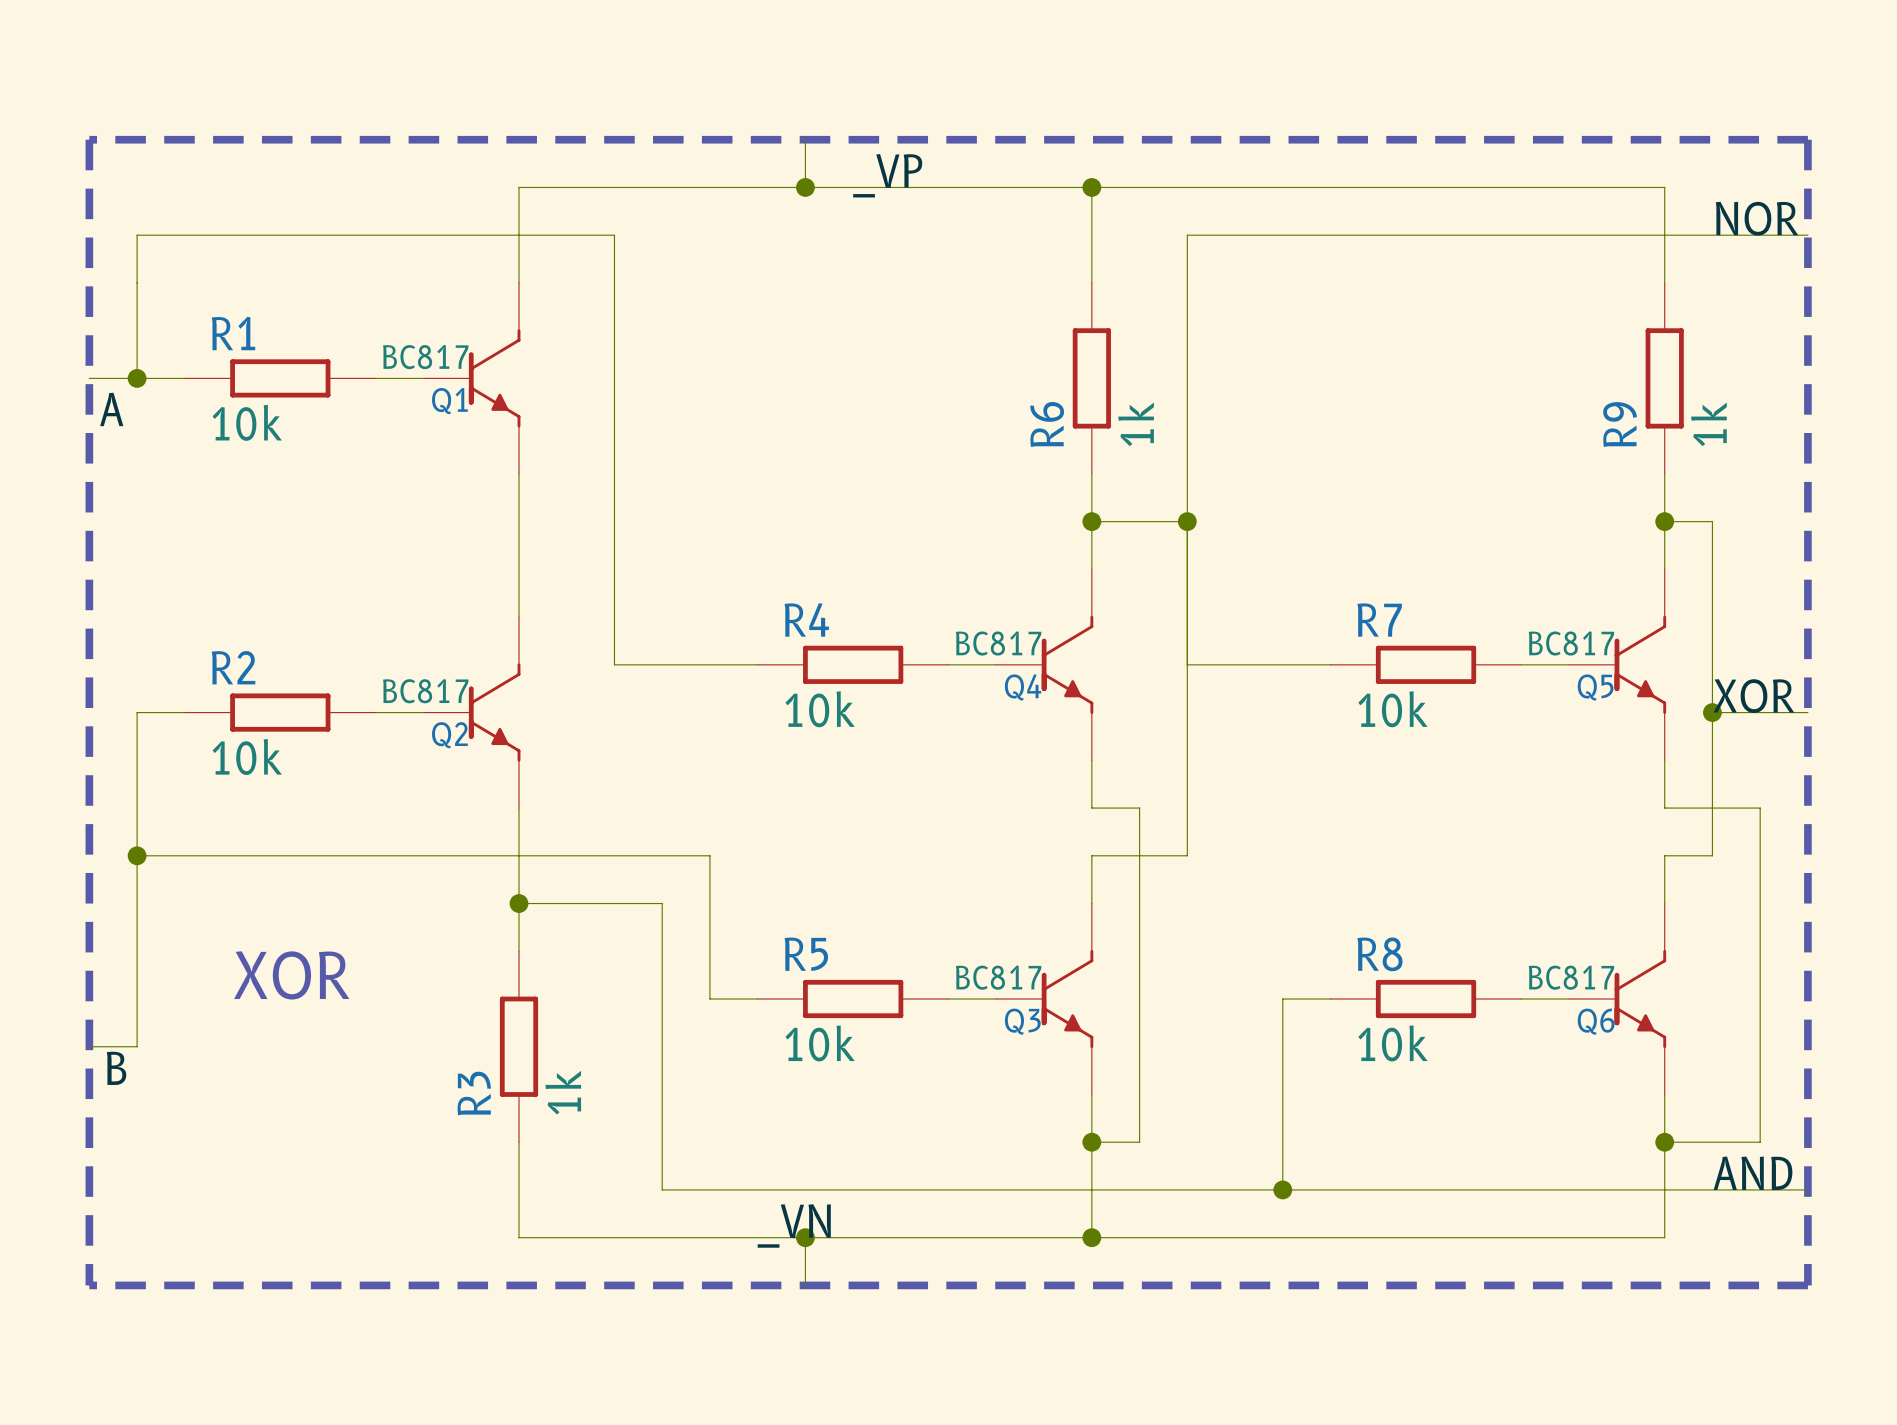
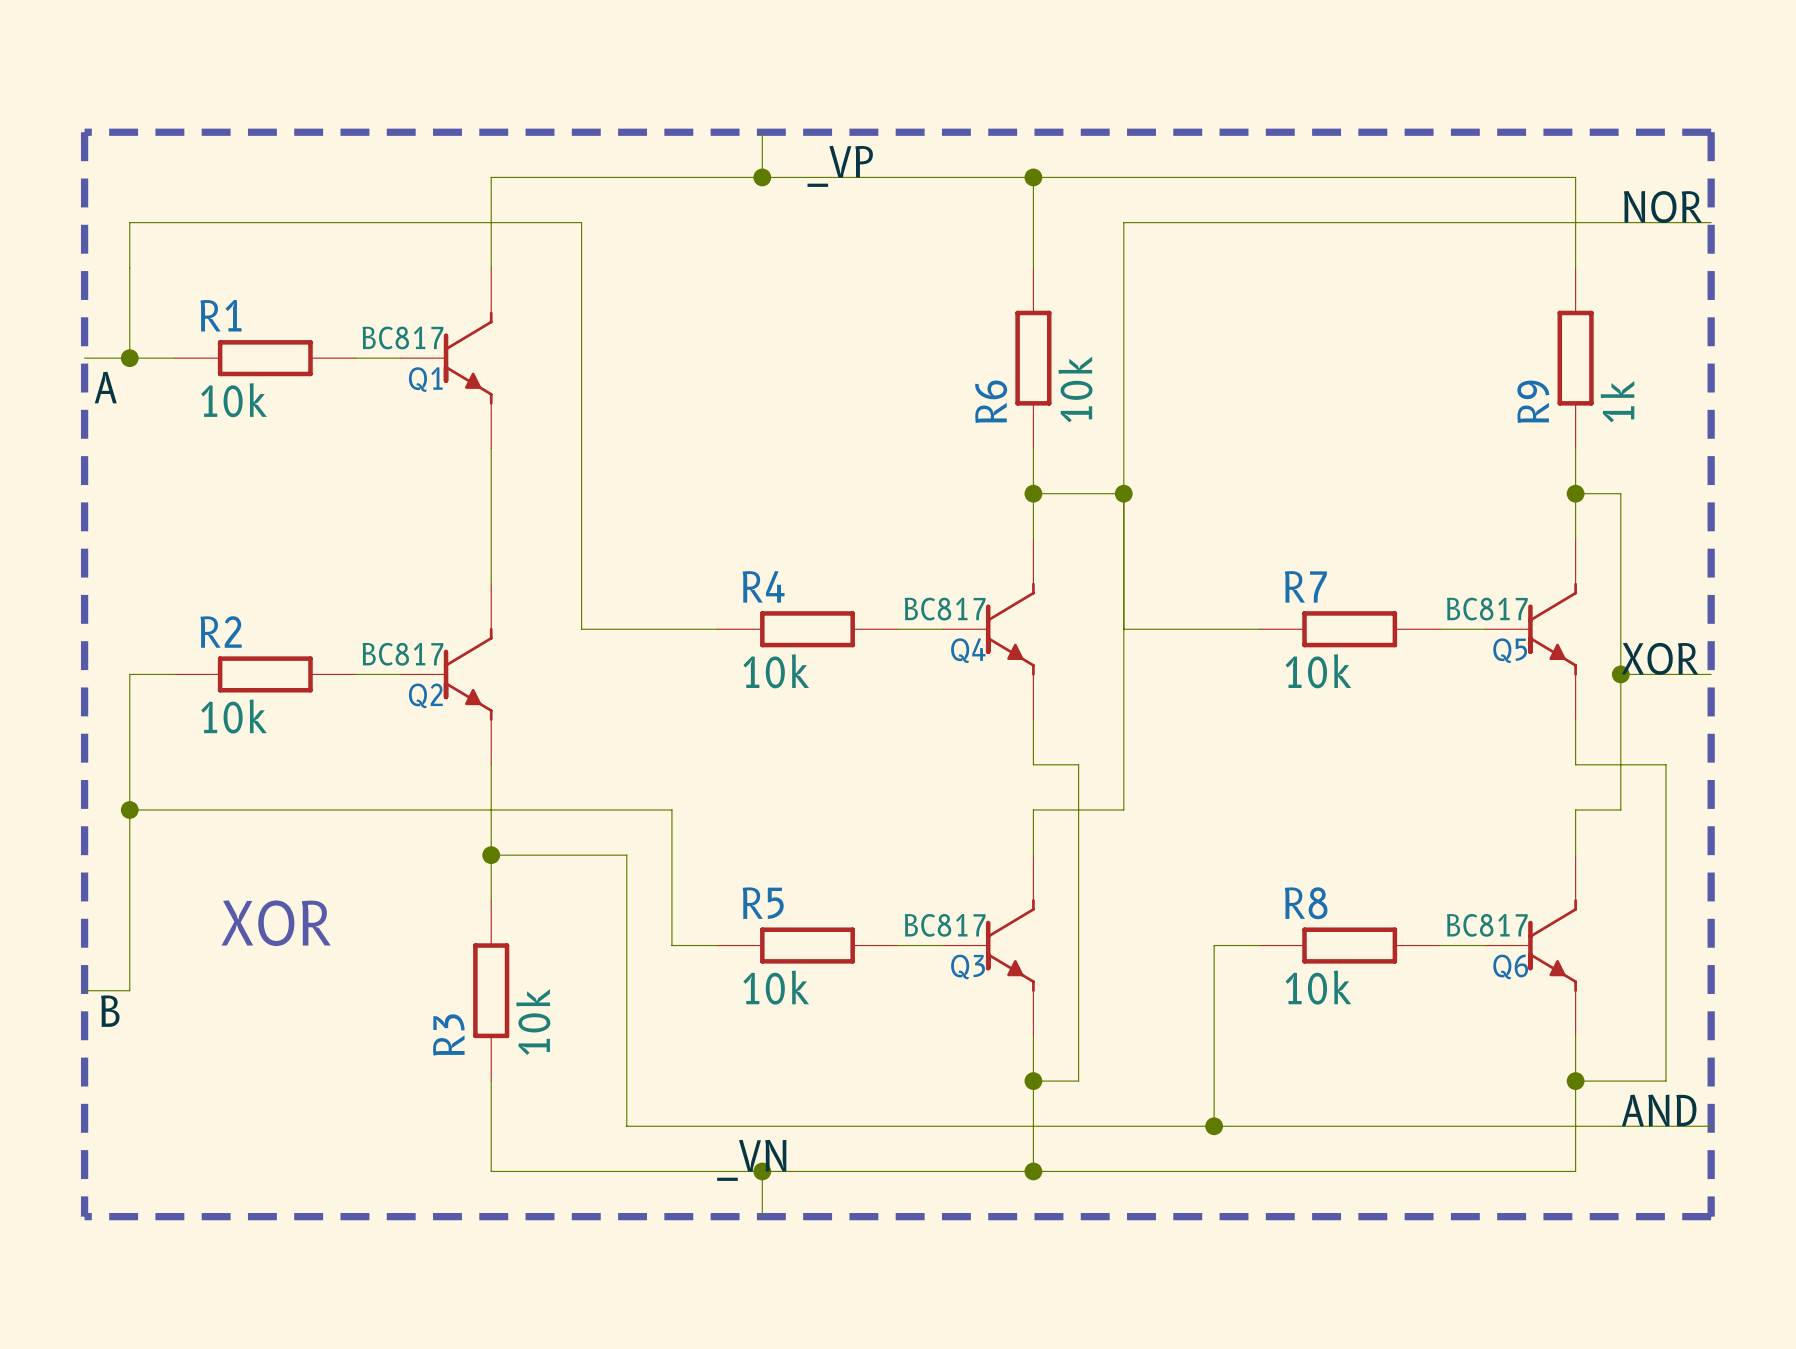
R6 value: 1k (1136, 424) -> 10k (1075, 389)
R3 value: 1k (563, 1092) -> 10k (533, 1022)

